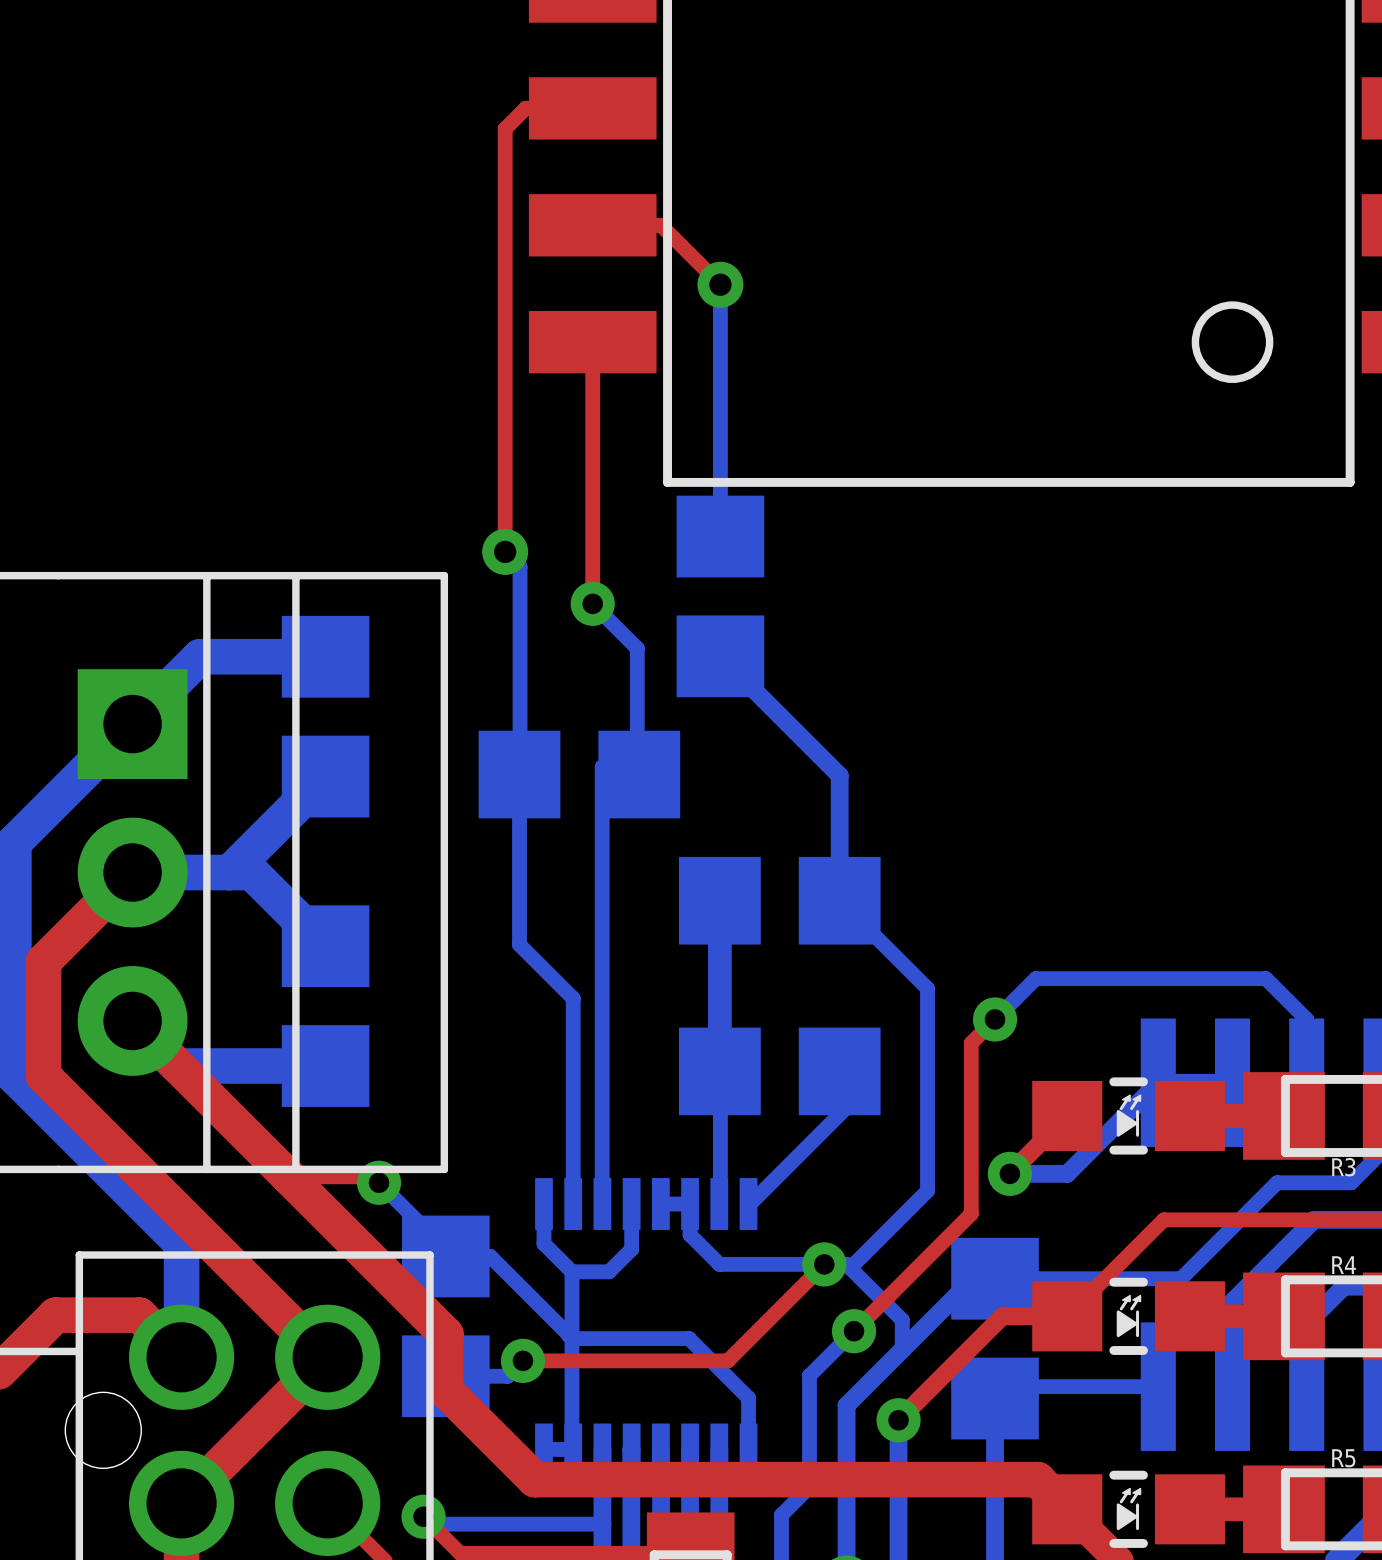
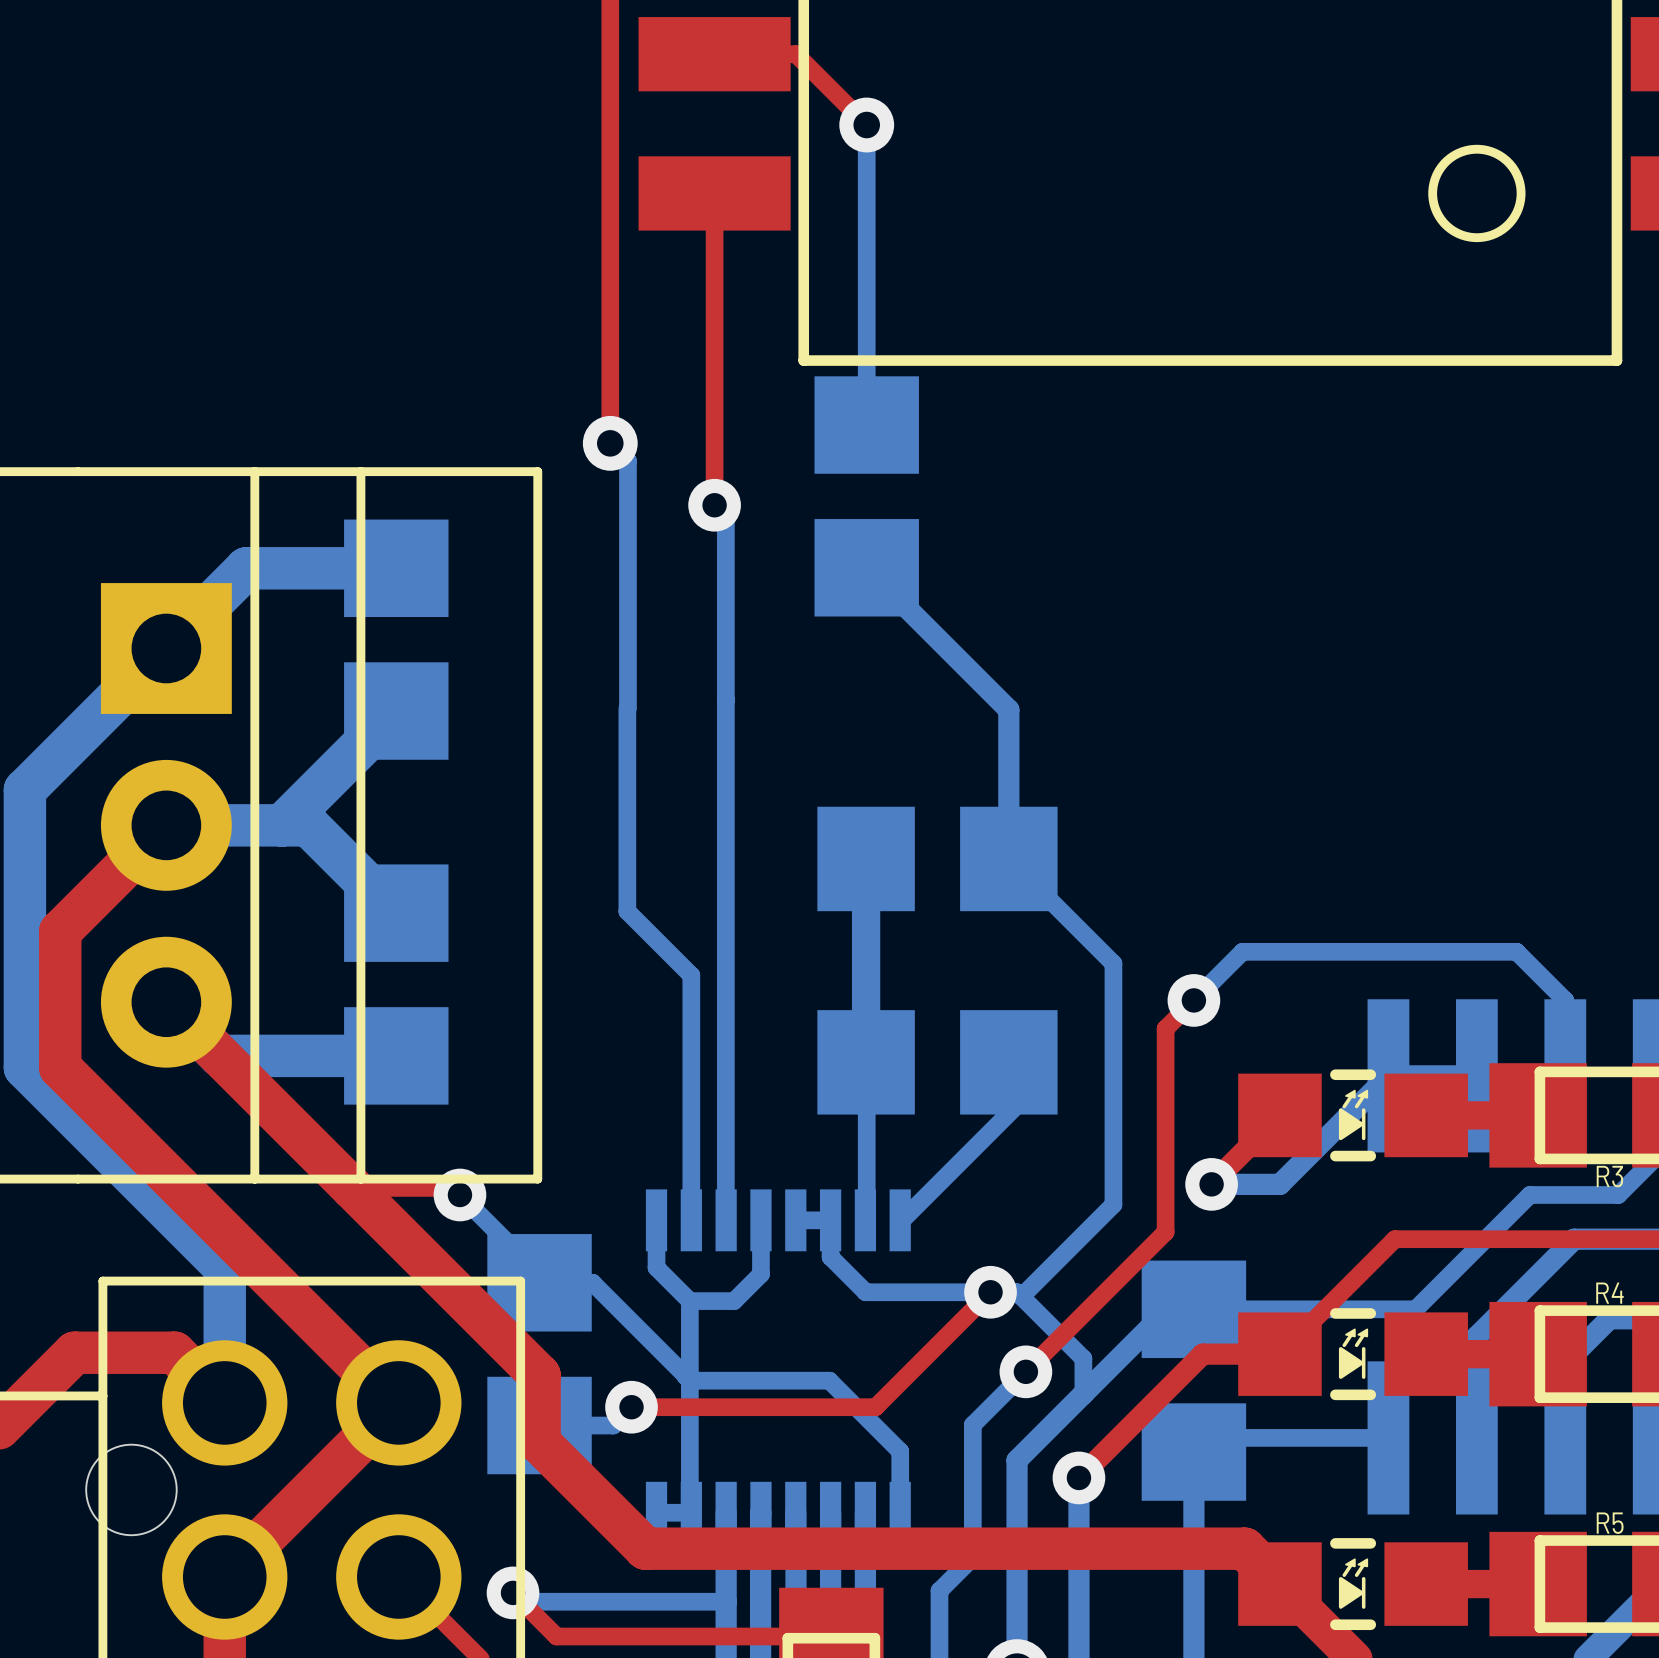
bottom track: (602, 613) (637, 648) (637, 774) -> (725, 516) (725, 699)
part: (579, 774) -> none

